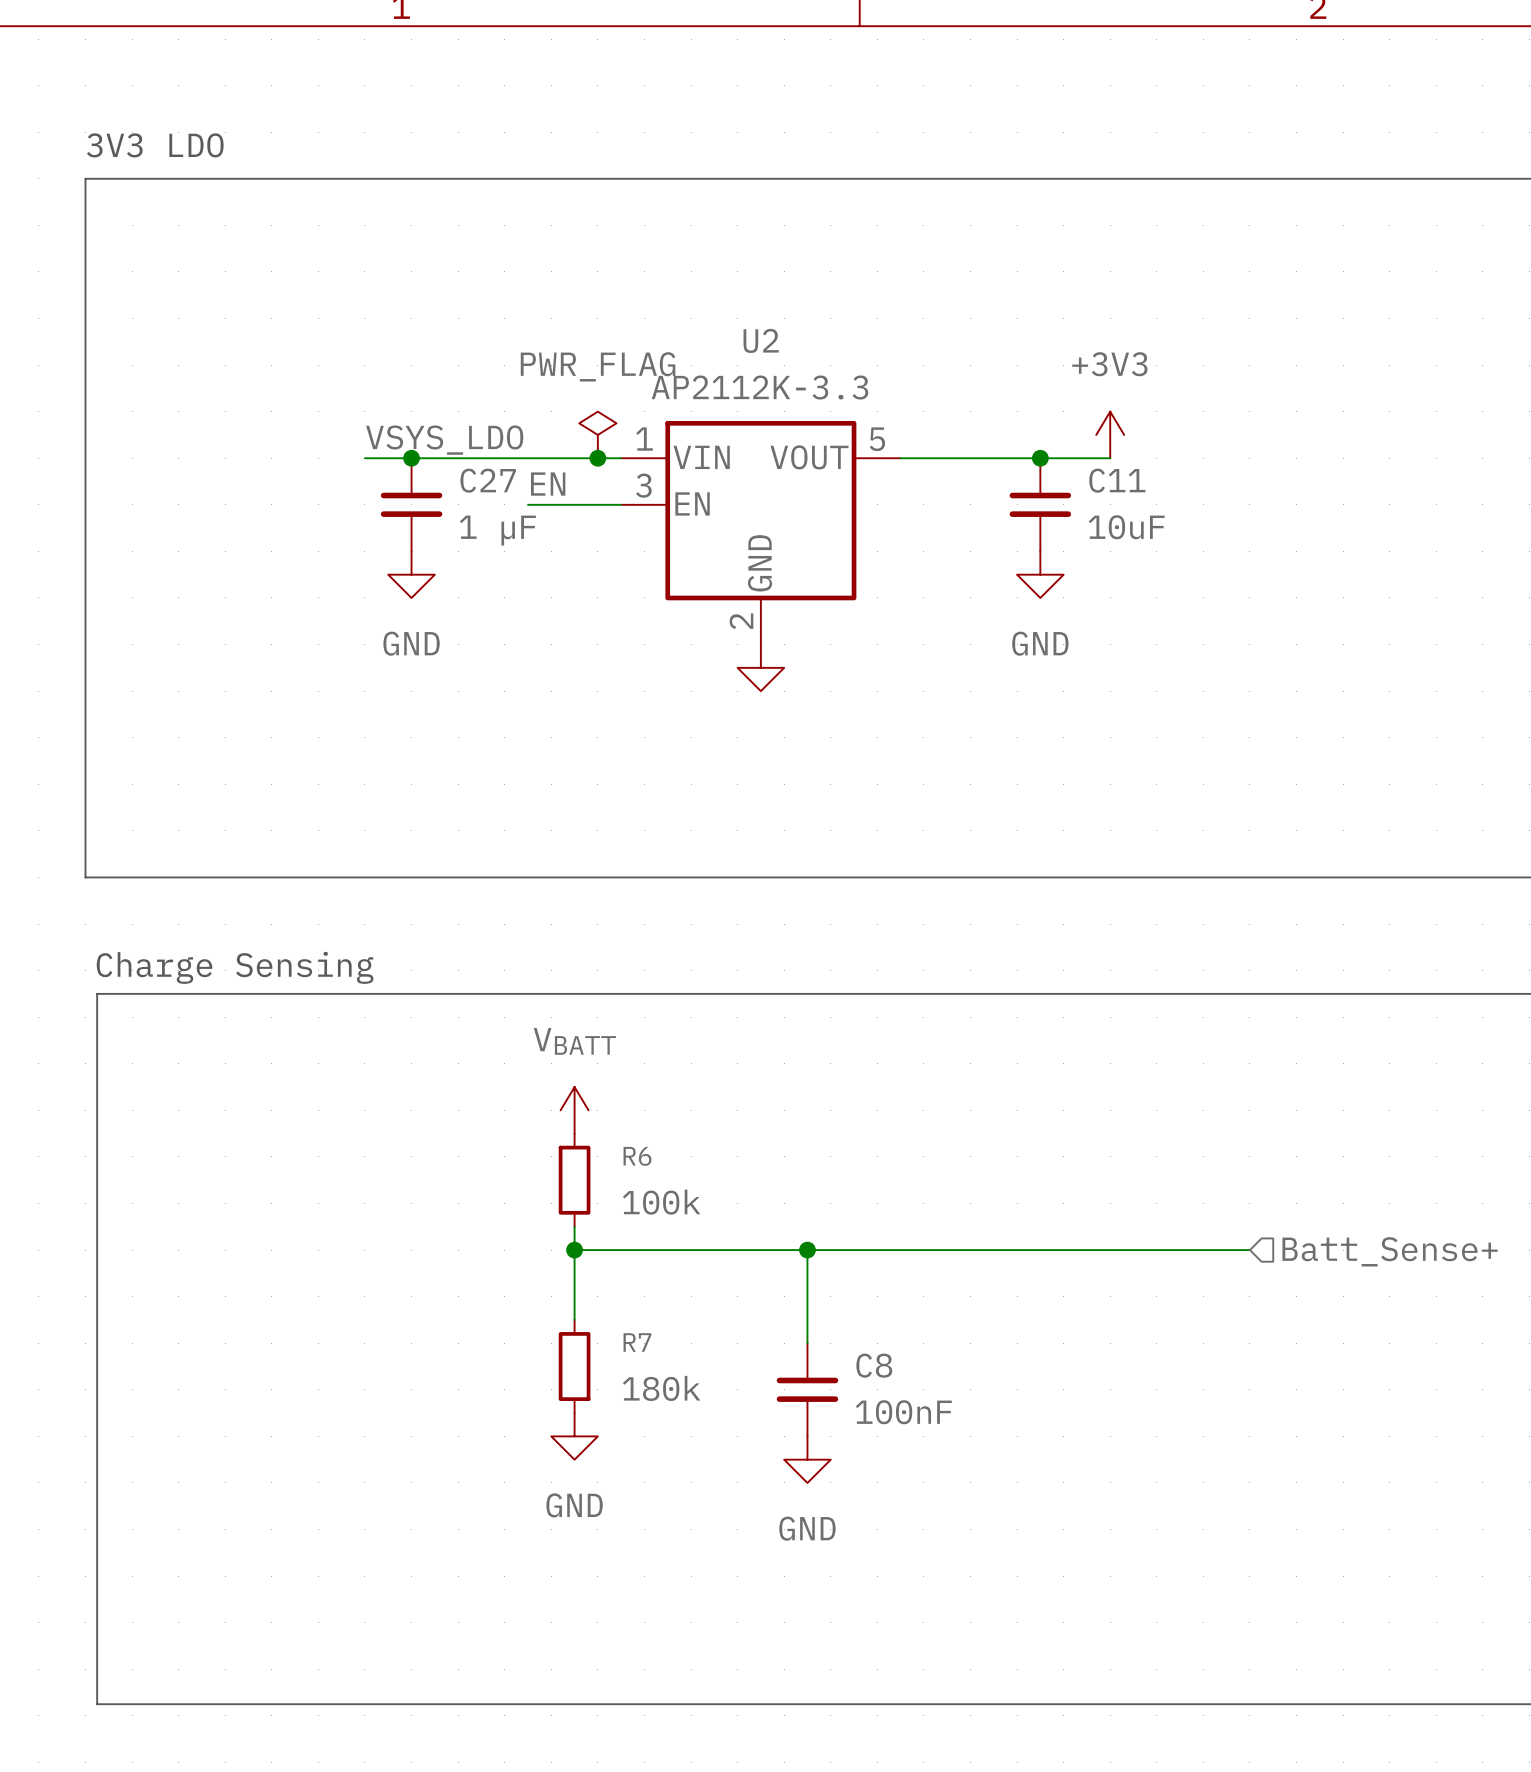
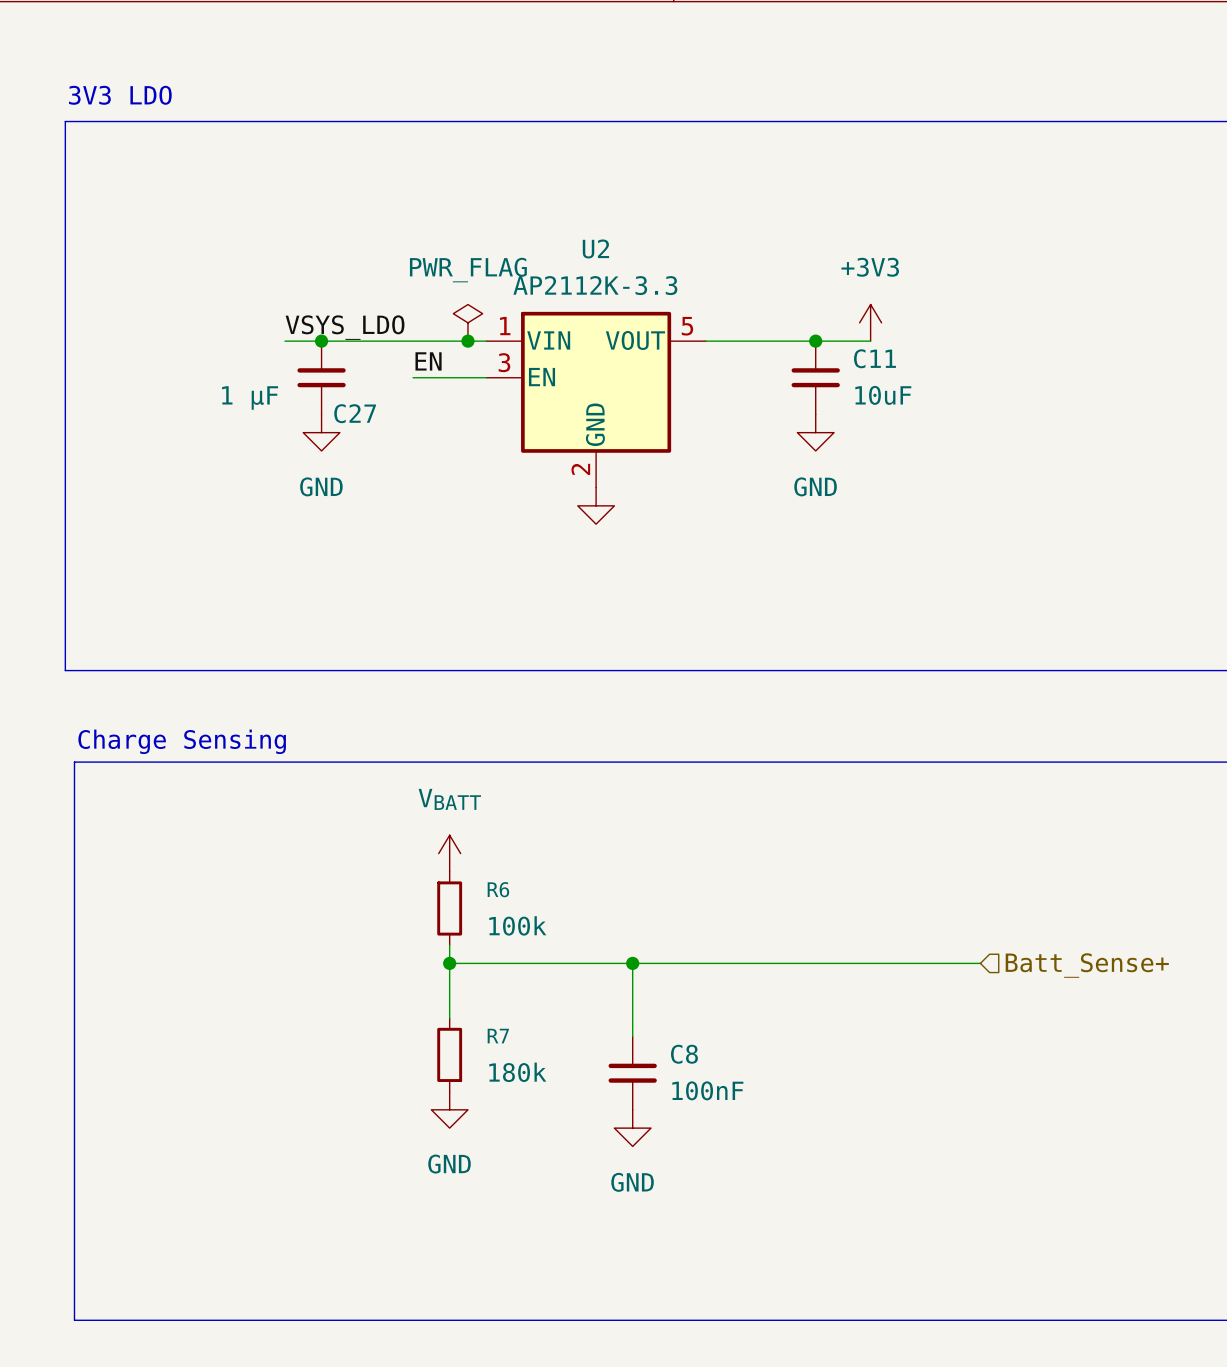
C27 name position: C27 (488, 480) -> C27 (355, 413)
C27 value position: 1 µF (497, 530) -> 1 µF (250, 397)

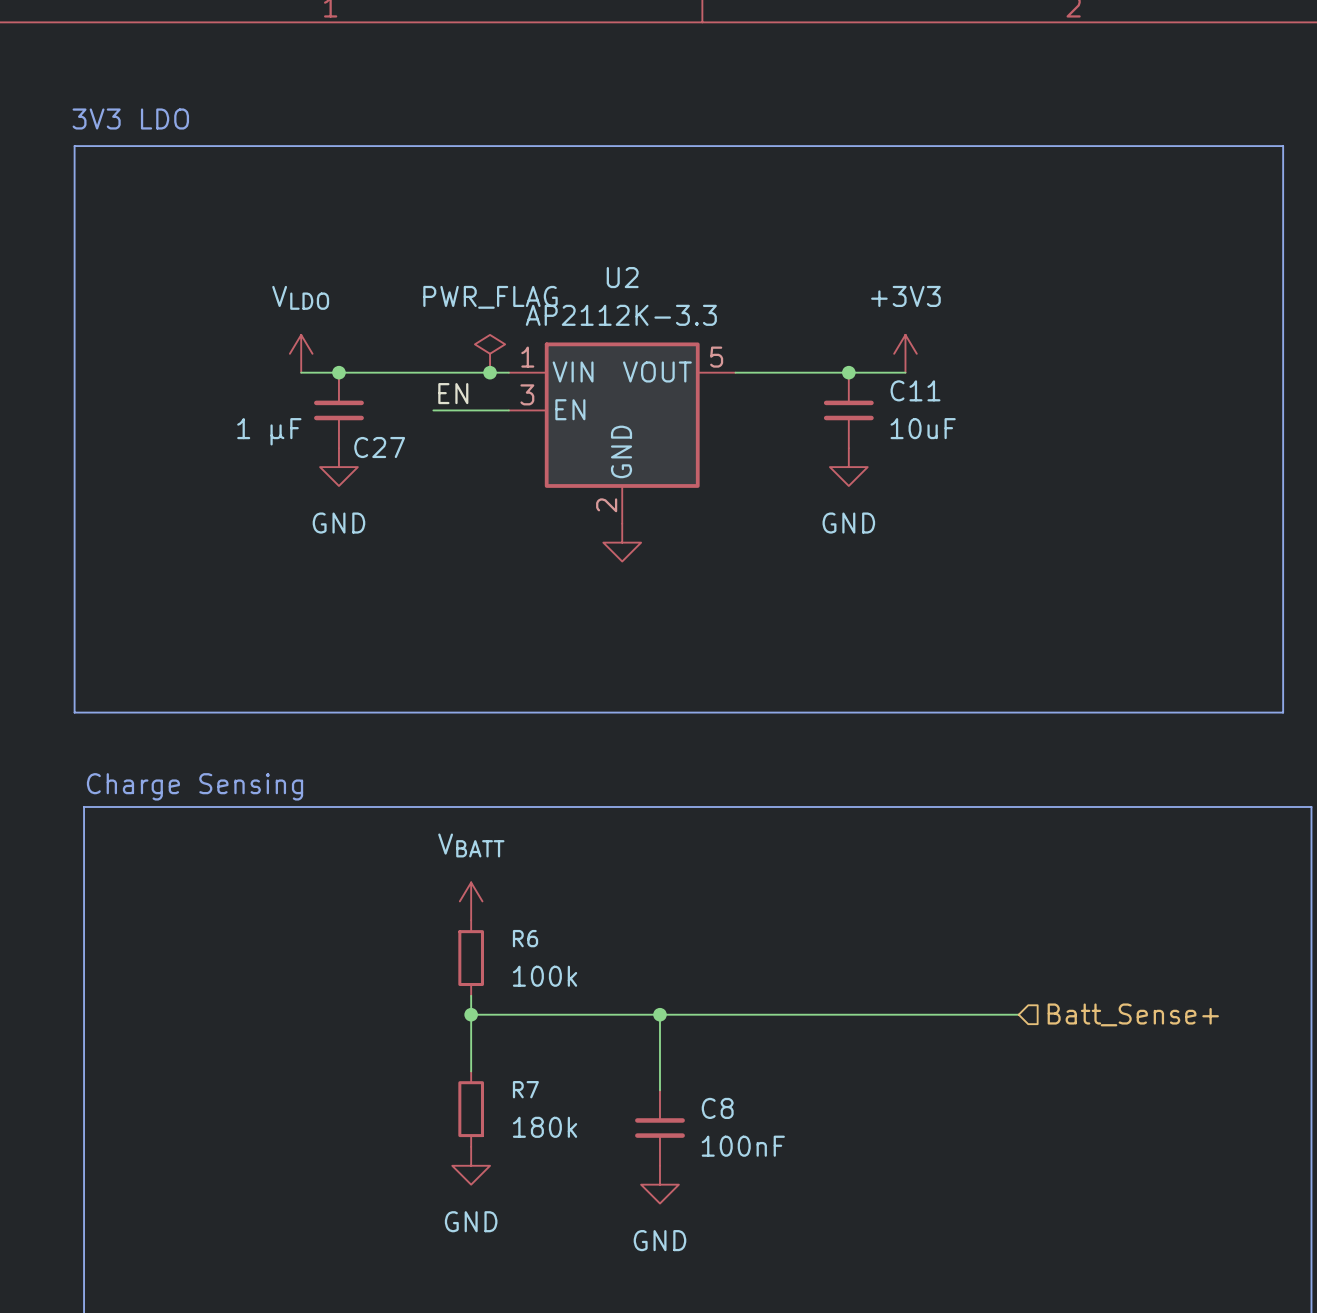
power symbol: none -> VLDO (301, 353)
label: VSYS_LDO (345, 327) -> none

